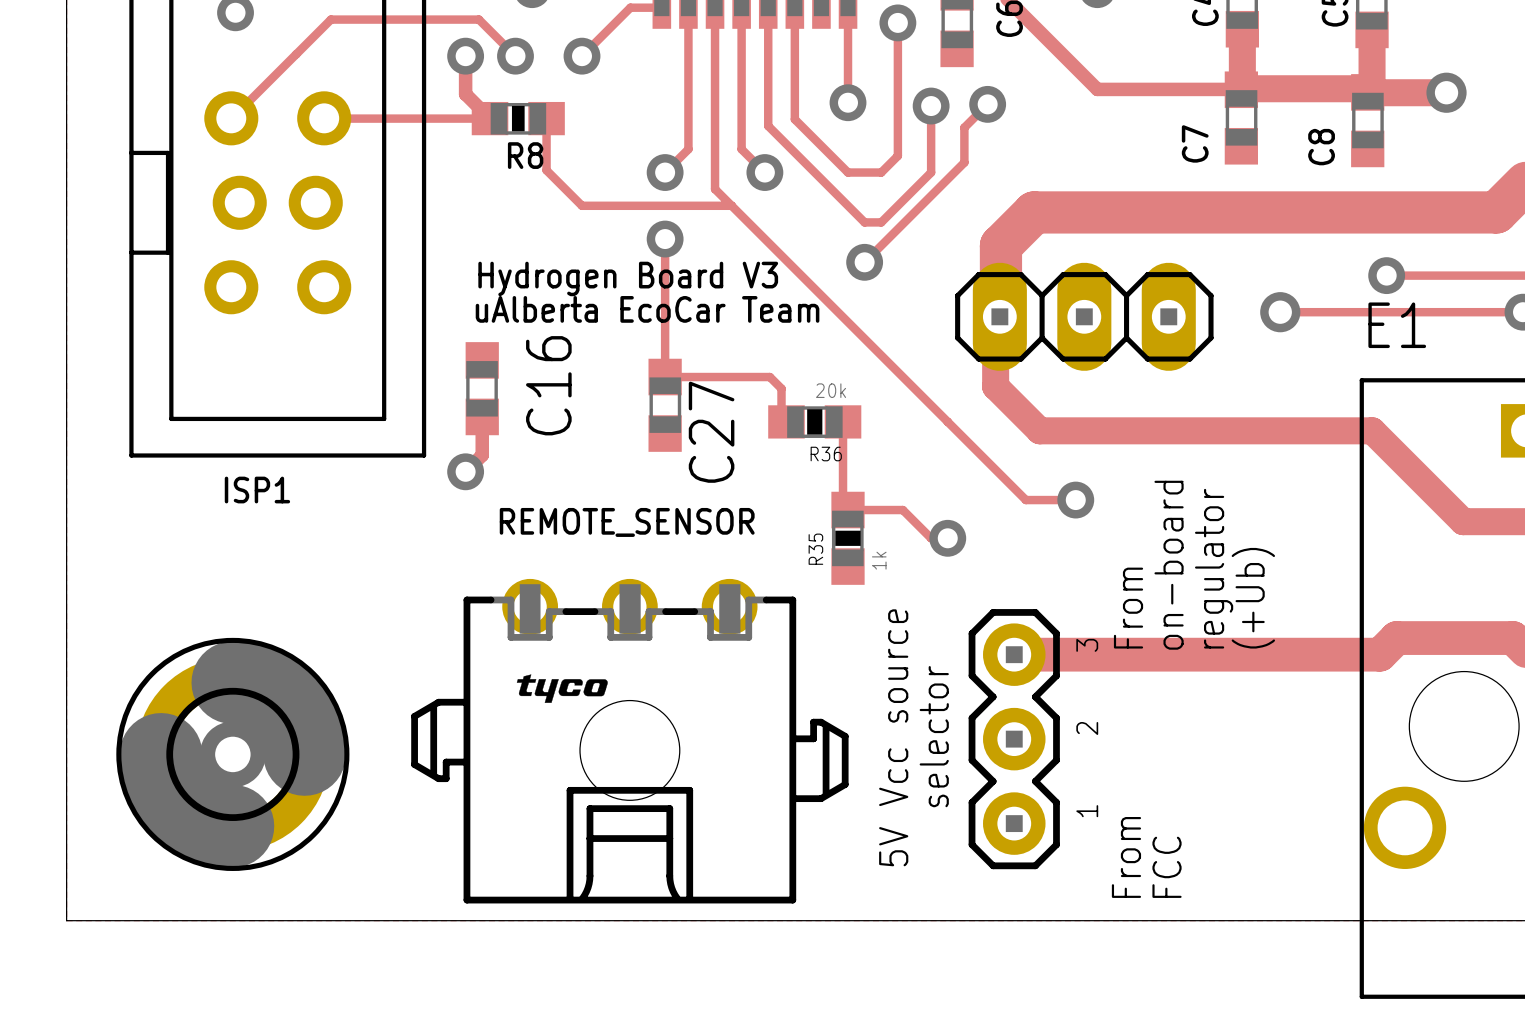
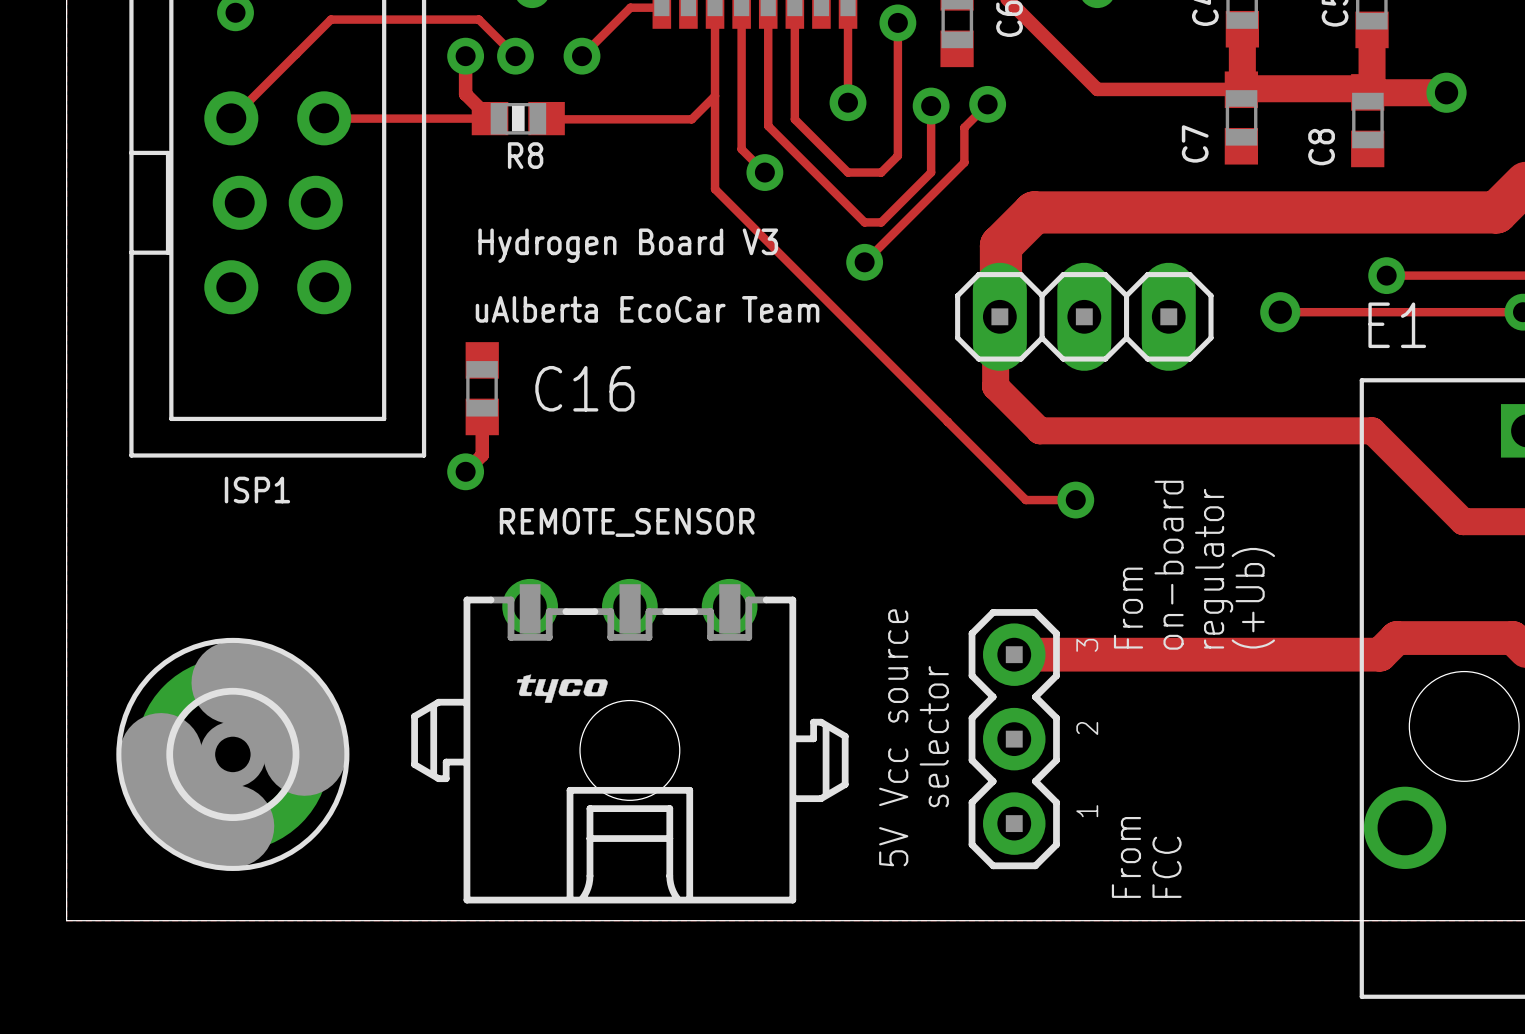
track: (688, 7) (688, 149) (665, 172) -> none
track: (546, 118) (546, 170) (582, 205) (731, 205) -> (546, 118) (691, 119) (715, 96)
via: (665, 172) -> none
track: (665, 239) (665, 377) (769, 377) (781, 388) (781, 416) (786, 421) -> none
via: (665, 239) -> none
text position: Hydrogen Board V3 (628, 278) -> Hydrogen Board V3 (628, 245)
C16 name rotation: 0° (548, 385) -> 90° clockwise (584, 388)
C27: (665, 405) -> none
R36: 20k (814, 421) -> none
track: (843, 421) (843, 505) (848, 510) (902, 510) (931, 538) (947, 538) -> none
R35: 1k (848, 538) -> none
via: (947, 538) -> none

